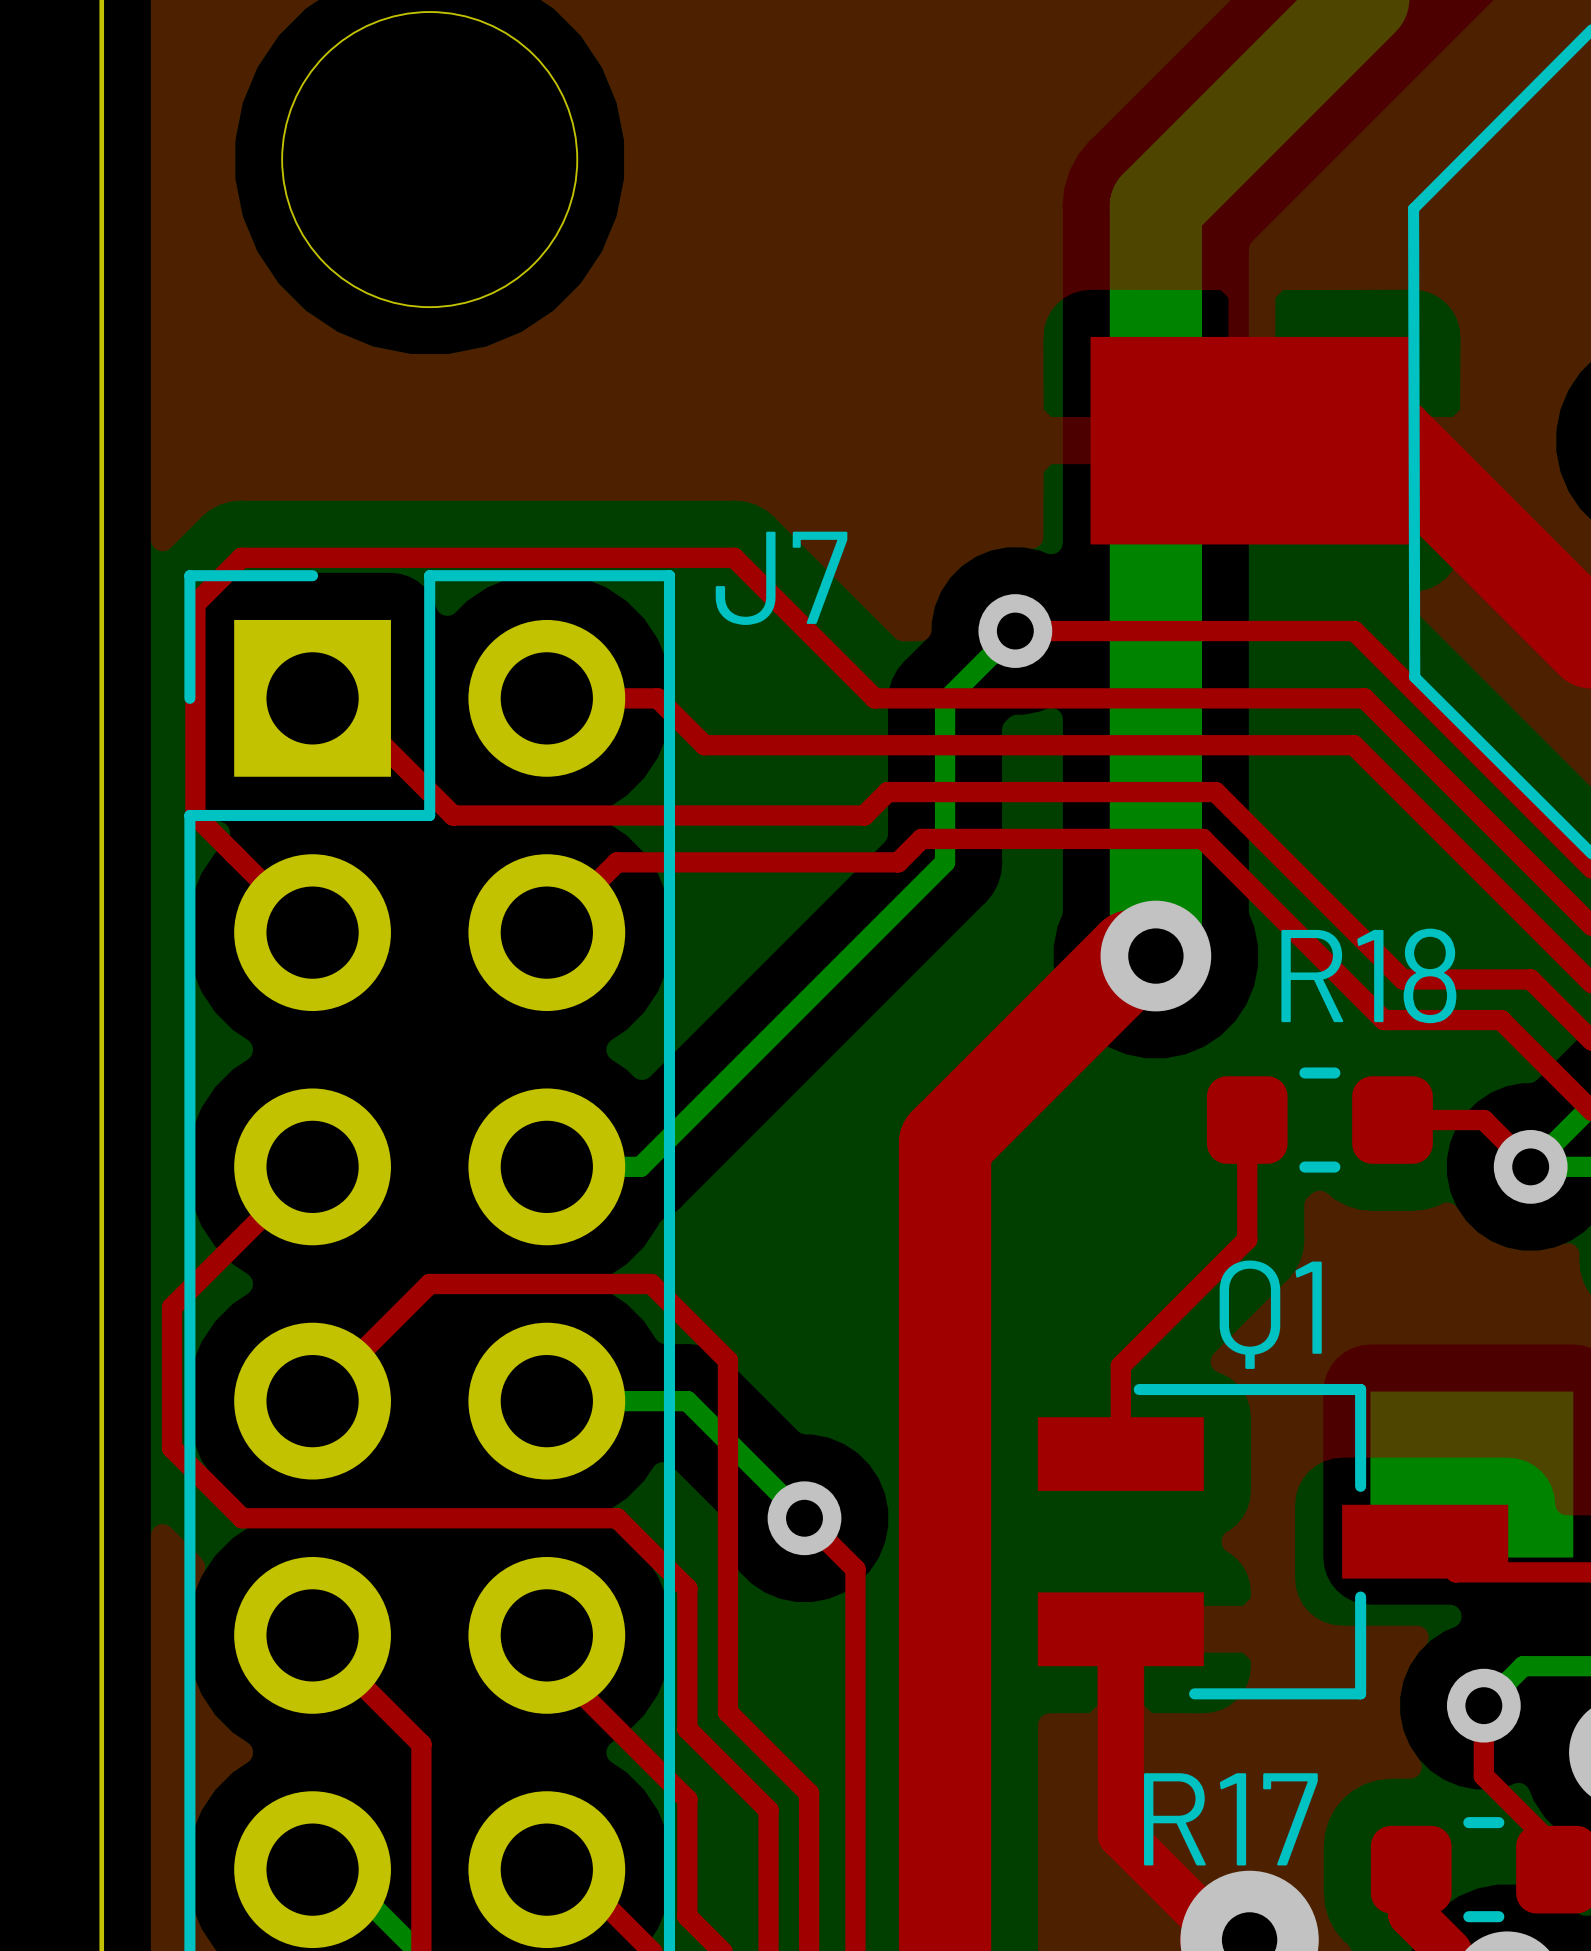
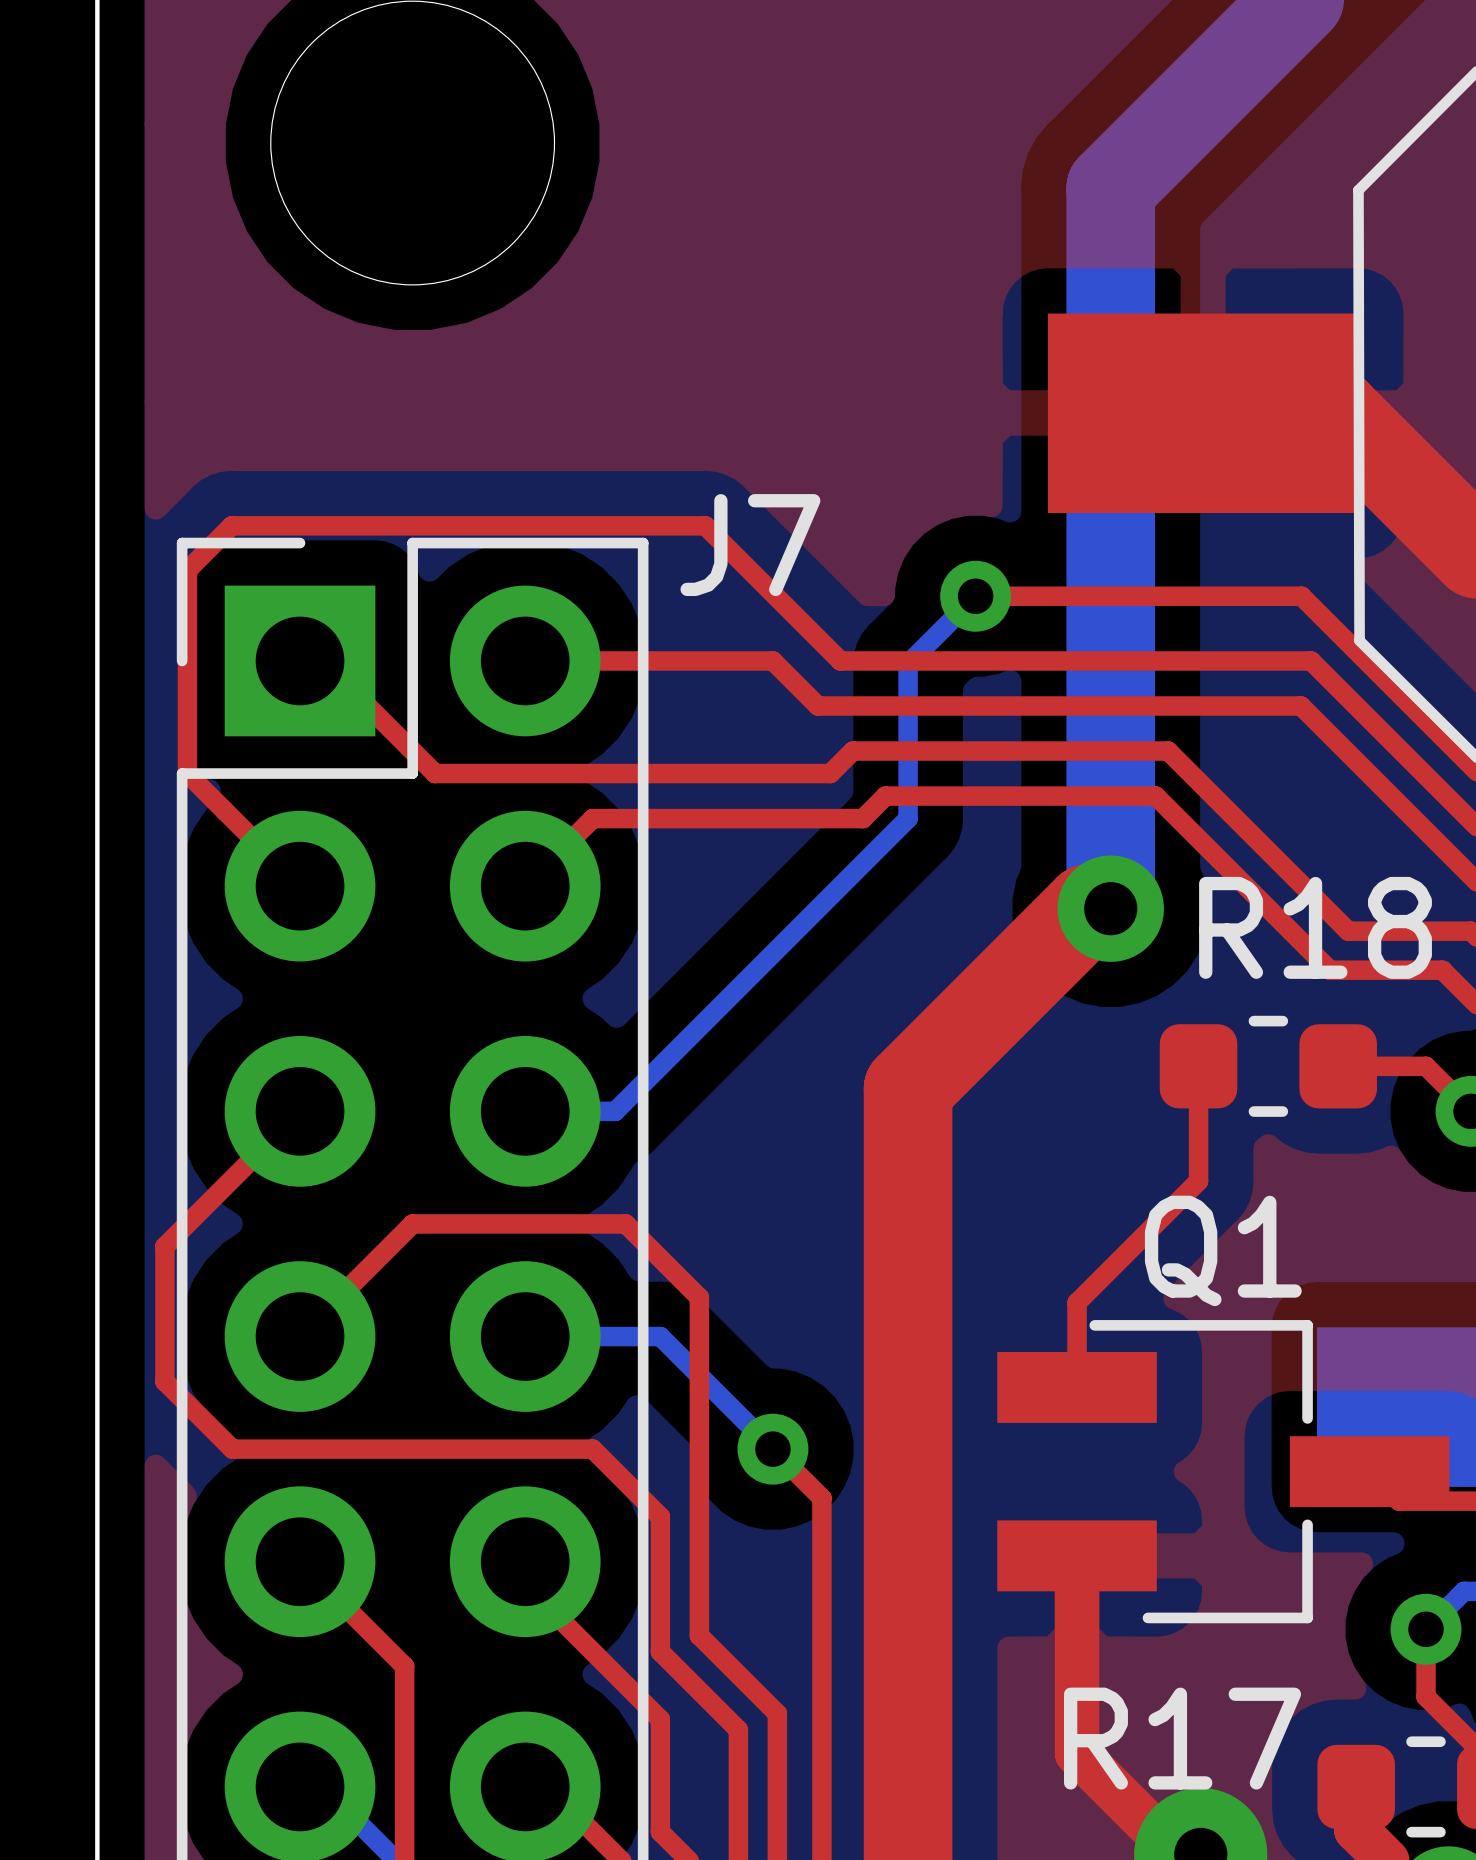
top track: (657, 698) (704, 745) (851, 745) -> (631, 660) (772, 660) (817, 706)

